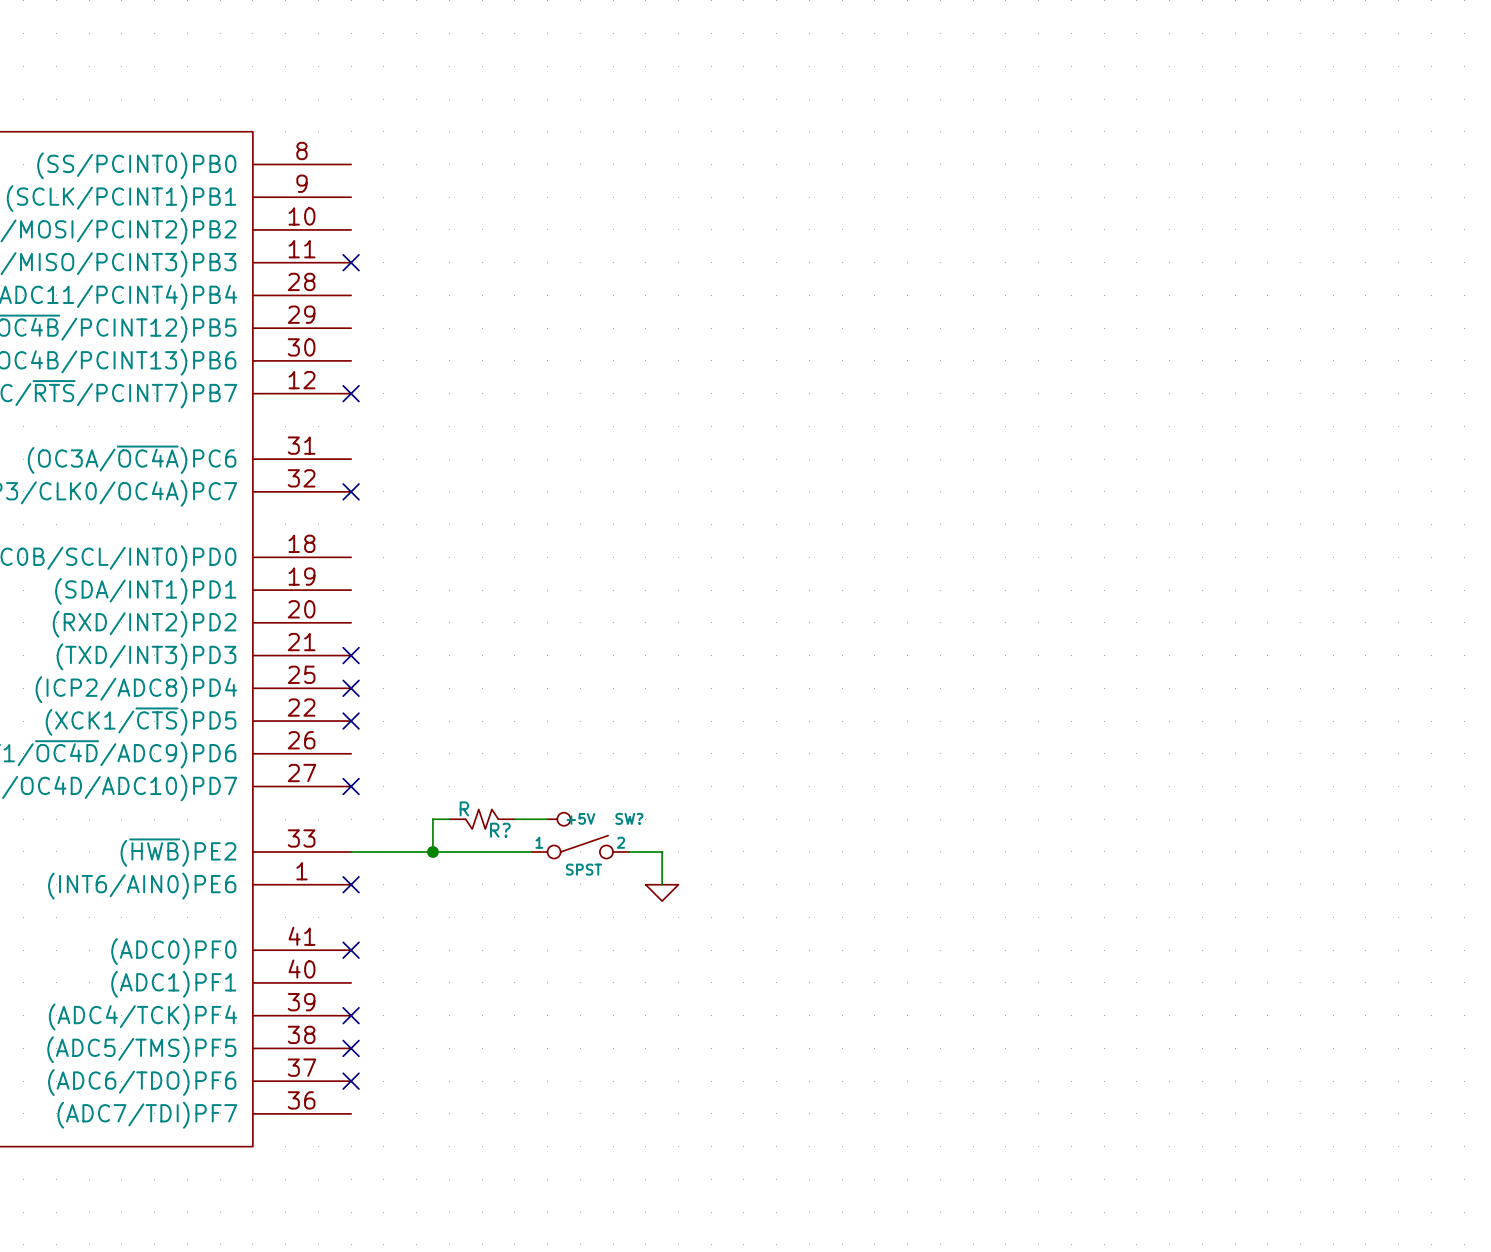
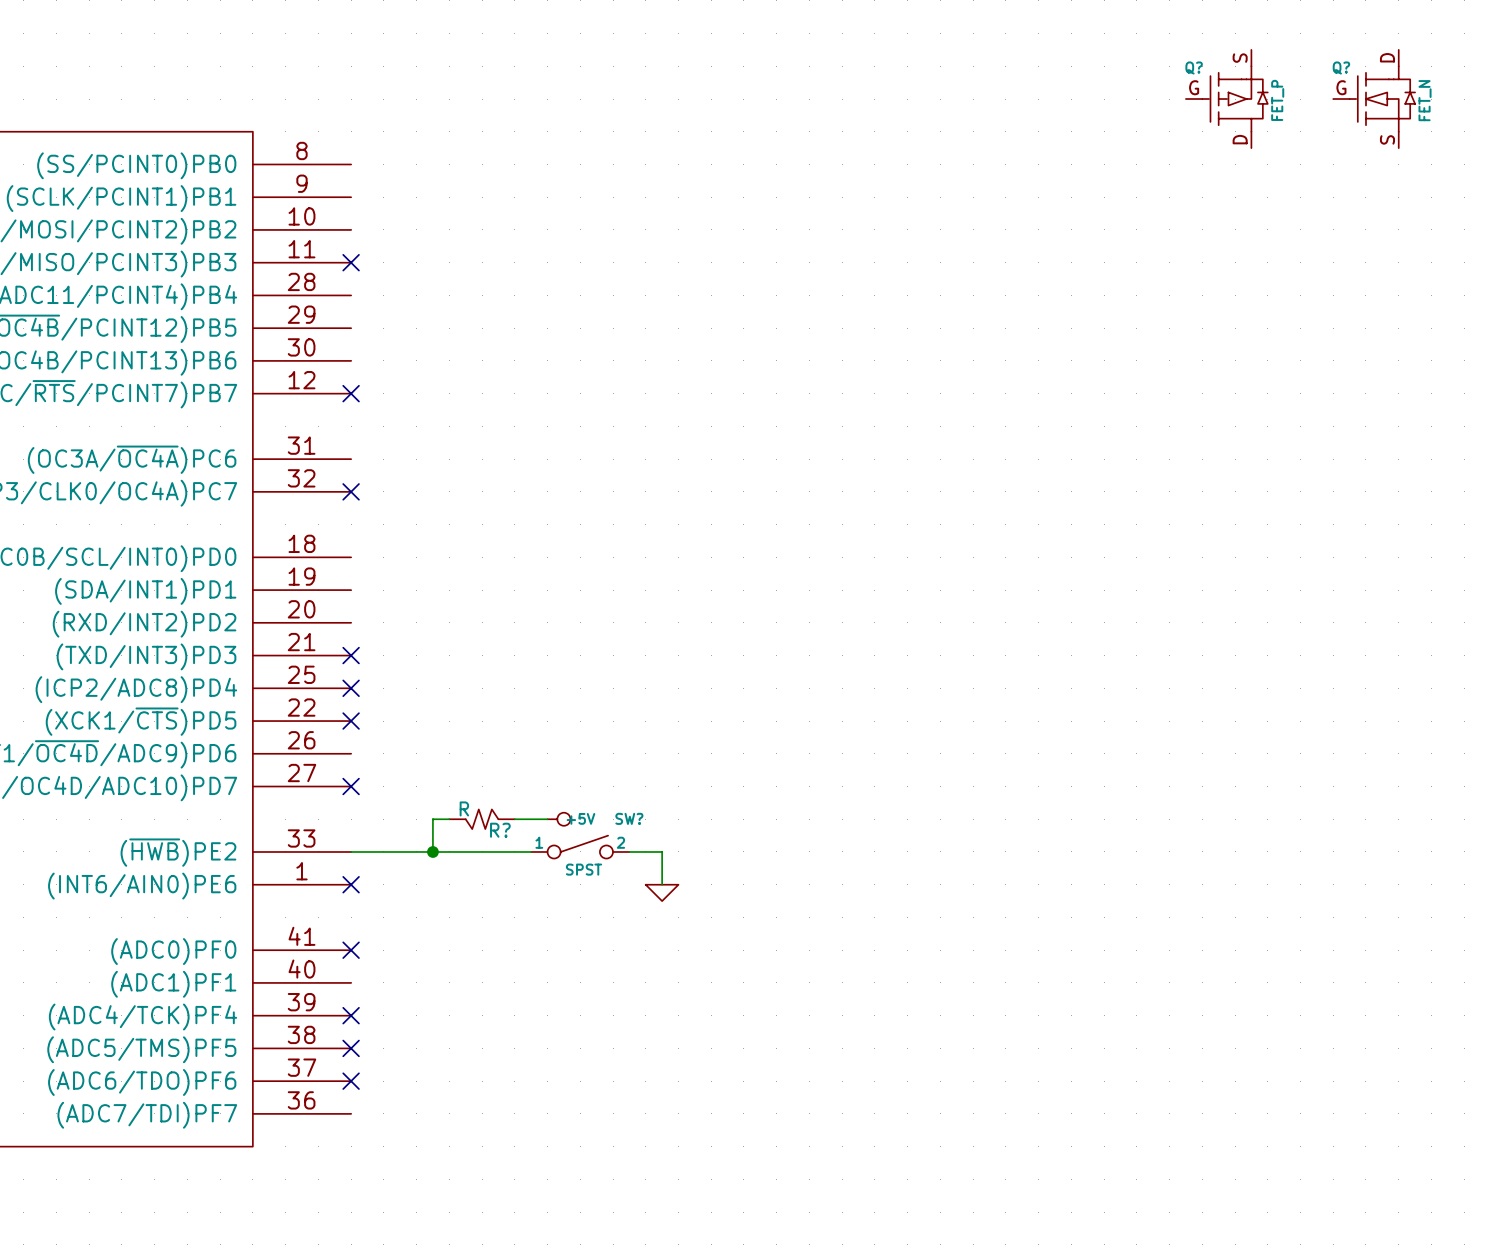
Q?: none -> FET_P (1226, 99)
Q?: none -> FET_N (1374, 99)

